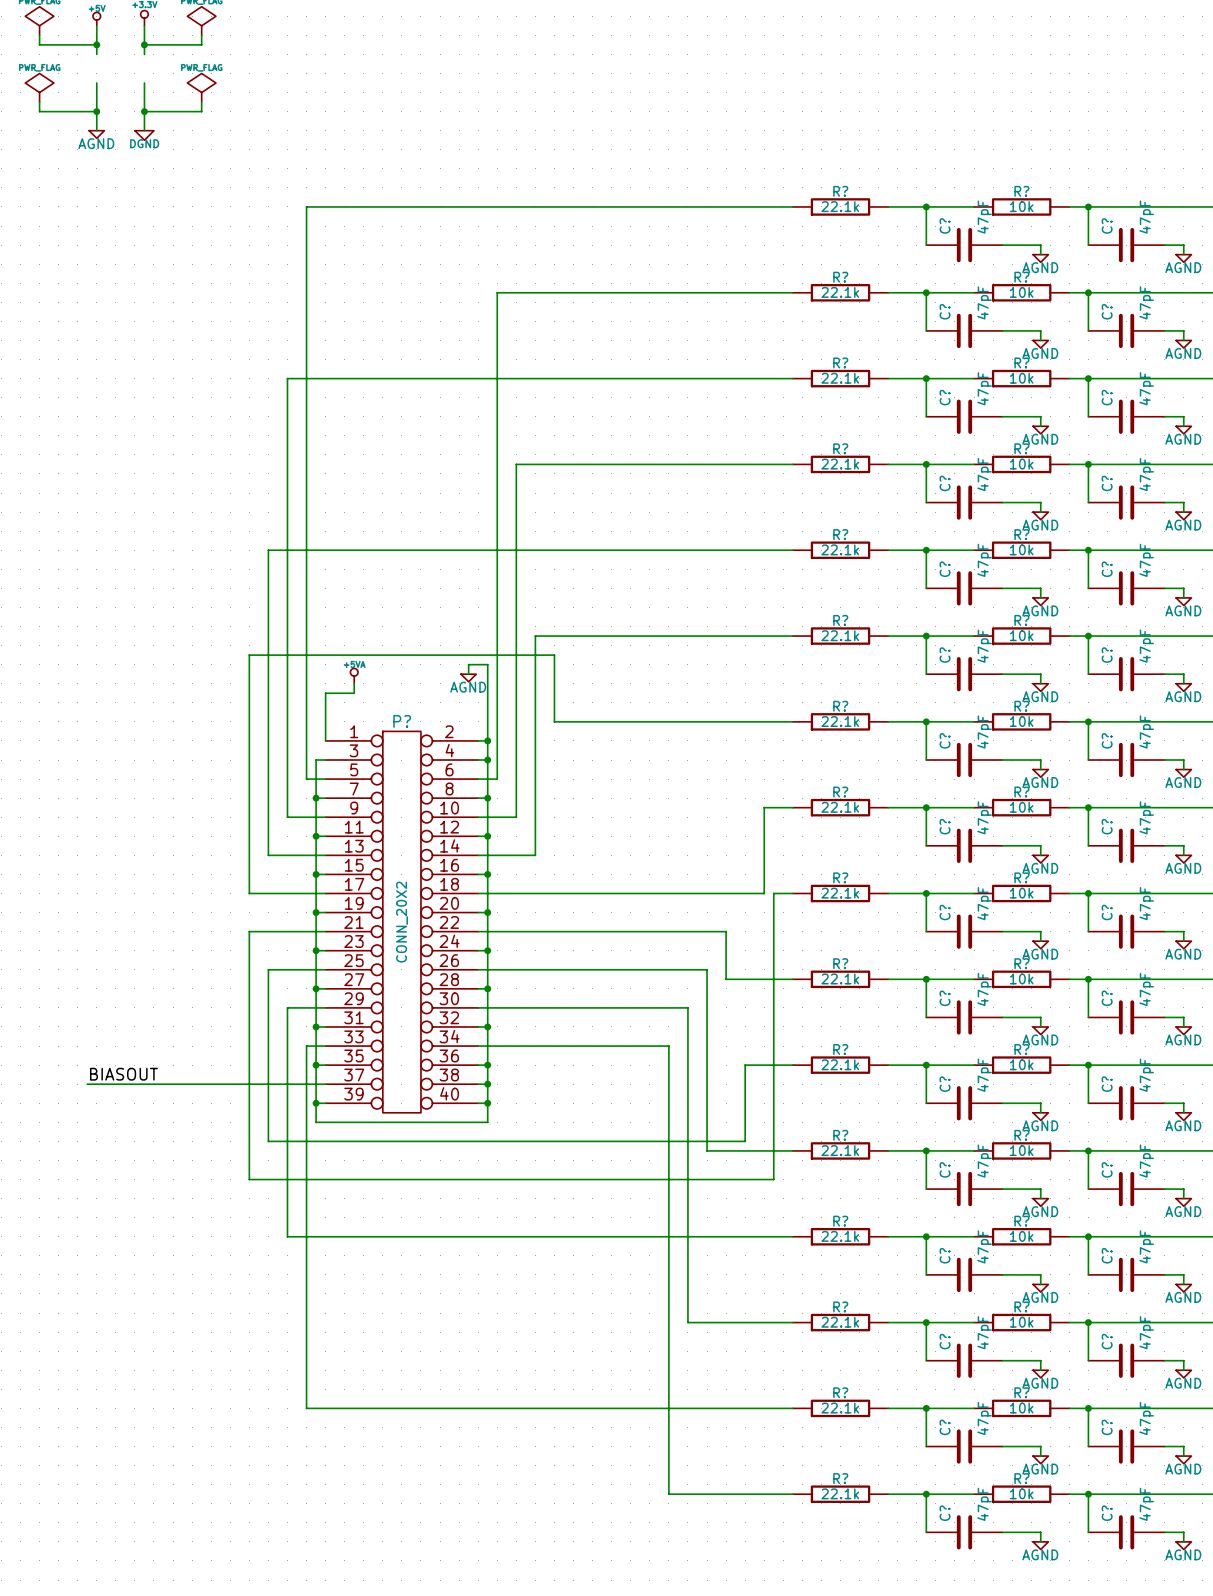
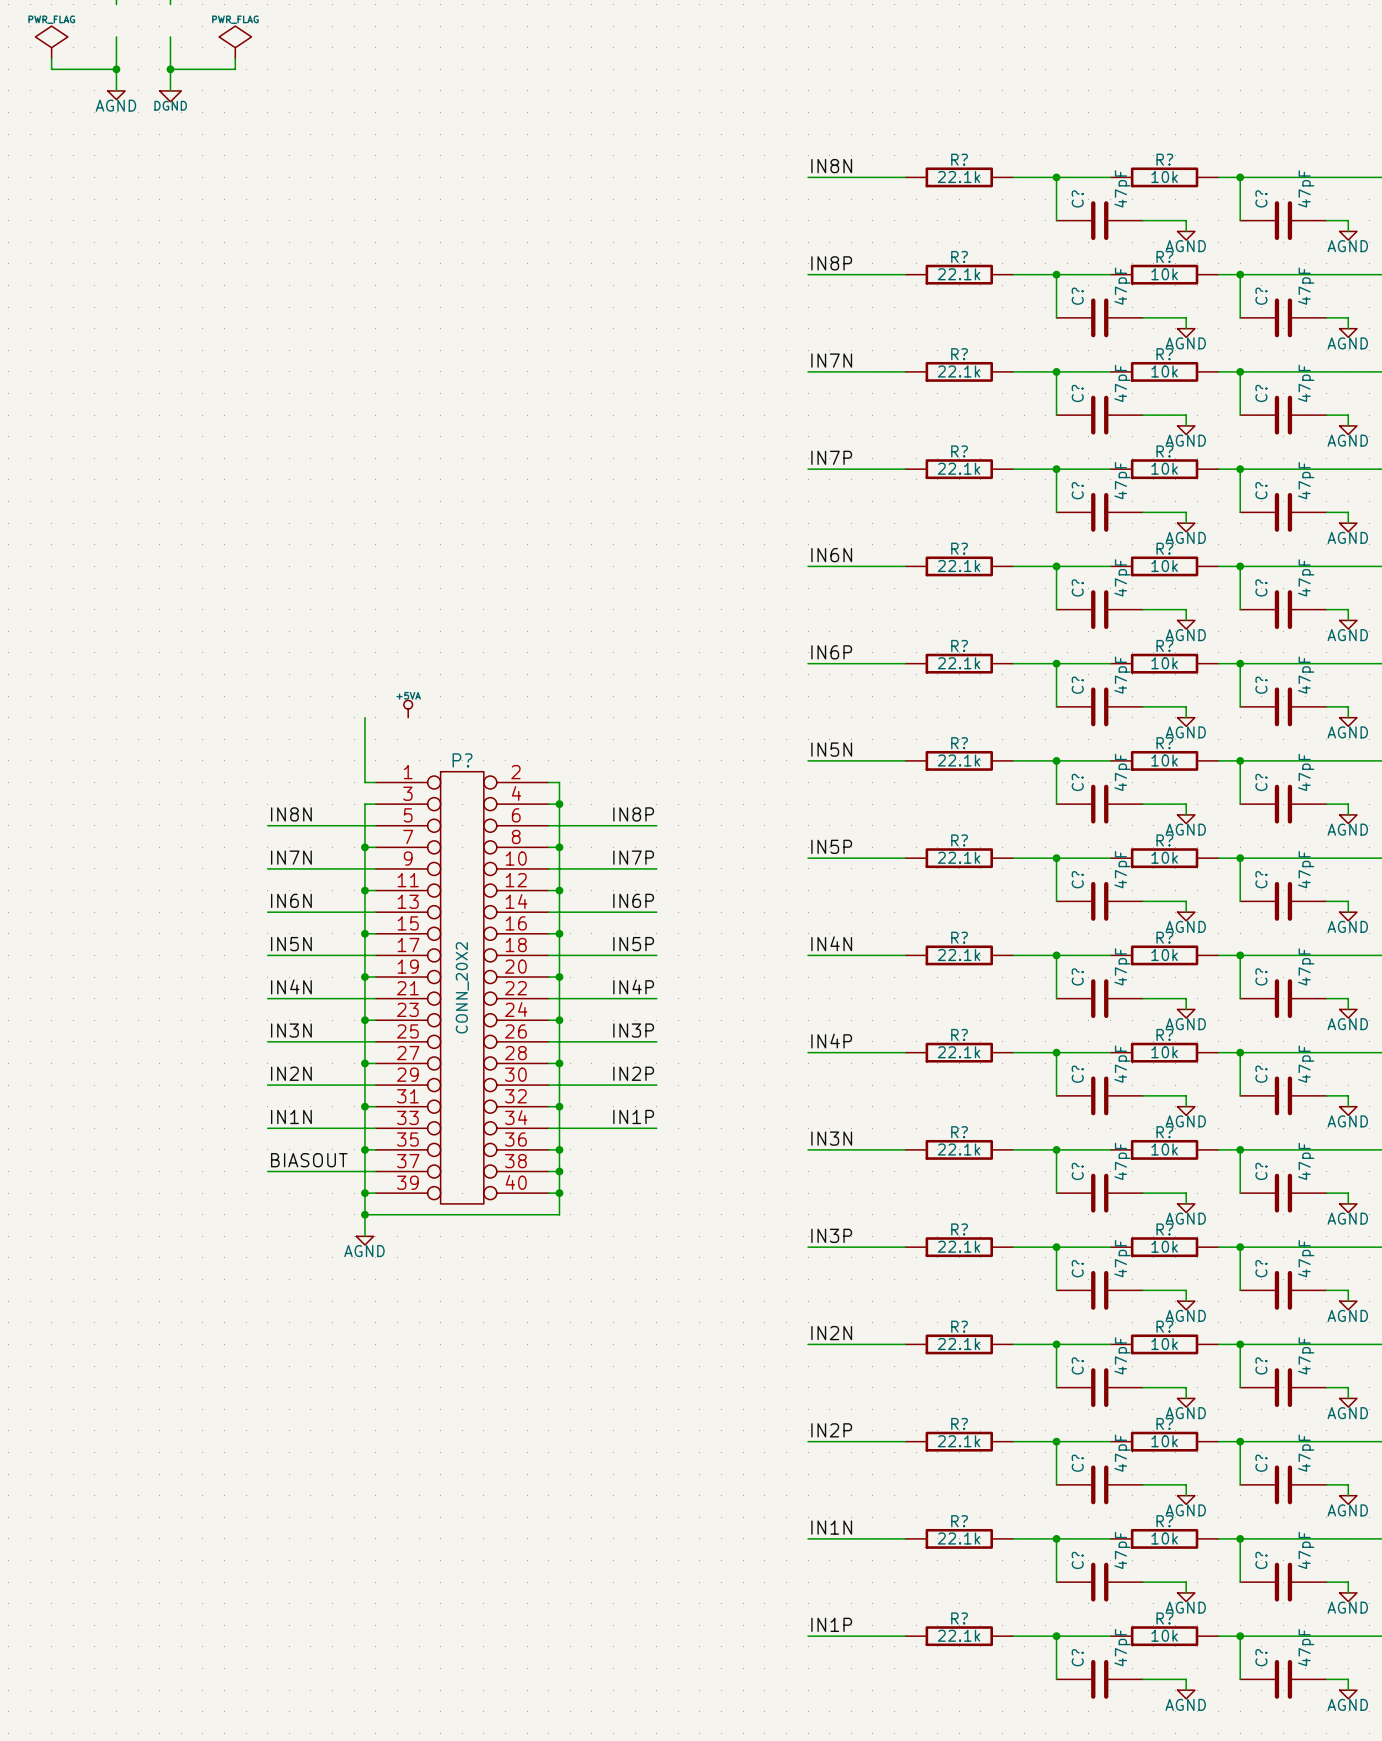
label: none -> IN8N (831, 166)
wire: (707, 206) (306, 206) (306, 779) -> (267, 825) (354, 825)
label: none -> IN8P (831, 263)
wire: (707, 292) (497, 292) (497, 779) -> (656, 825) (570, 825)
label: none -> IN7N (831, 360)
wire: (707, 378) (287, 378) (287, 817) -> (267, 868) (332, 868)
label: none -> IN7P (831, 457)
wire: (707, 464) (516, 464) (516, 817) -> (656, 868) (591, 868)
label: none -> IN6N (831, 555)
wire: (707, 550) (268, 550) (268, 855) -> (267, 912) (310, 912)
label: none -> IN6P (831, 652)
wire: (707, 636) (535, 636) (535, 855) -> (656, 912) (613, 912)
wire: (468, 674) (468, 664) (487, 664) (487, 740) -> none
power symbol: AGND (468, 678) -> none
wire: (354, 683) (354, 693) (325, 693) (325, 740) -> (364, 717) (364, 782) (375, 782)
label: none -> IN5N (831, 749)
wire: (707, 721) (554, 721) (554, 655) (249, 655) (249, 893) -> (267, 955) (289, 955)
junction: (487, 740) -> none
label: none -> IN8N (291, 814)
label: none -> IN8P (633, 814)
label: none -> IN5P (831, 846)
label: none -> IN7N (291, 857)
label: none -> IN7P (633, 857)
wire: none -> (808, 858) (872, 858)
wire: (764, 807) (764, 893) -> (883, 955) (872, 955)
label: none -> IN6N (291, 900)
label: none -> IN6P (633, 900)
label: none -> IN5N (291, 944)
label: none -> IN5P (633, 944)
label: none -> IN4N (831, 943)
wire: (573, 893) (707, 893) -> none
wire: (773, 893) (773, 1179) (249, 1179) (249, 931) -> (267, 998) (289, 998)
label: none -> IN4N (291, 987)
label: none -> IN4P (633, 987)
wire: (573, 931) (726, 931) (726, 979) -> (808, 1052) (829, 1052)
label: none -> IN3N (291, 1030)
label: none -> IN3P (633, 1030)
wire: none -> (267, 1041) (310, 1041)
wire: (268, 969) (268, 1141) (745, 1141) (745, 1065) -> (808, 1149) (851, 1149)
wire: (573, 969) (707, 969) (707, 1150) -> none
label: none -> IN4P (831, 1041)
label: none -> IN2N (291, 1073)
label: none -> IN2P (633, 1073)
wire: (287, 1007) (287, 1236) (707, 1236) -> (332, 1085) (267, 1085)
wire: (573, 1007) (687, 1007) (687, 1322) (707, 1322) -> none
label: none -> IN1N (291, 1116)
label: none -> IN1P (633, 1116)
wire: (306, 1046) (306, 1408) (707, 1408) -> (354, 1128) (267, 1128)
wire: (573, 1046) (668, 1046) (668, 1494) (707, 1494) -> none
label: none -> IN3N (831, 1138)
label position: BIASOUT (123, 1074) -> BIASOUT (309, 1160)
wire: (87, 1084) (230, 1084) -> none
wire: none -> (364, 1214) (364, 1236)
junction: none -> (364, 1214)
label: none -> IN3P (831, 1235)
power symbol: none -> AGND (364, 1240)
label: none -> IN2N (831, 1333)
label: none -> IN2P (831, 1430)
label: none -> IN1N (831, 1527)
label: none -> IN1P (831, 1624)

